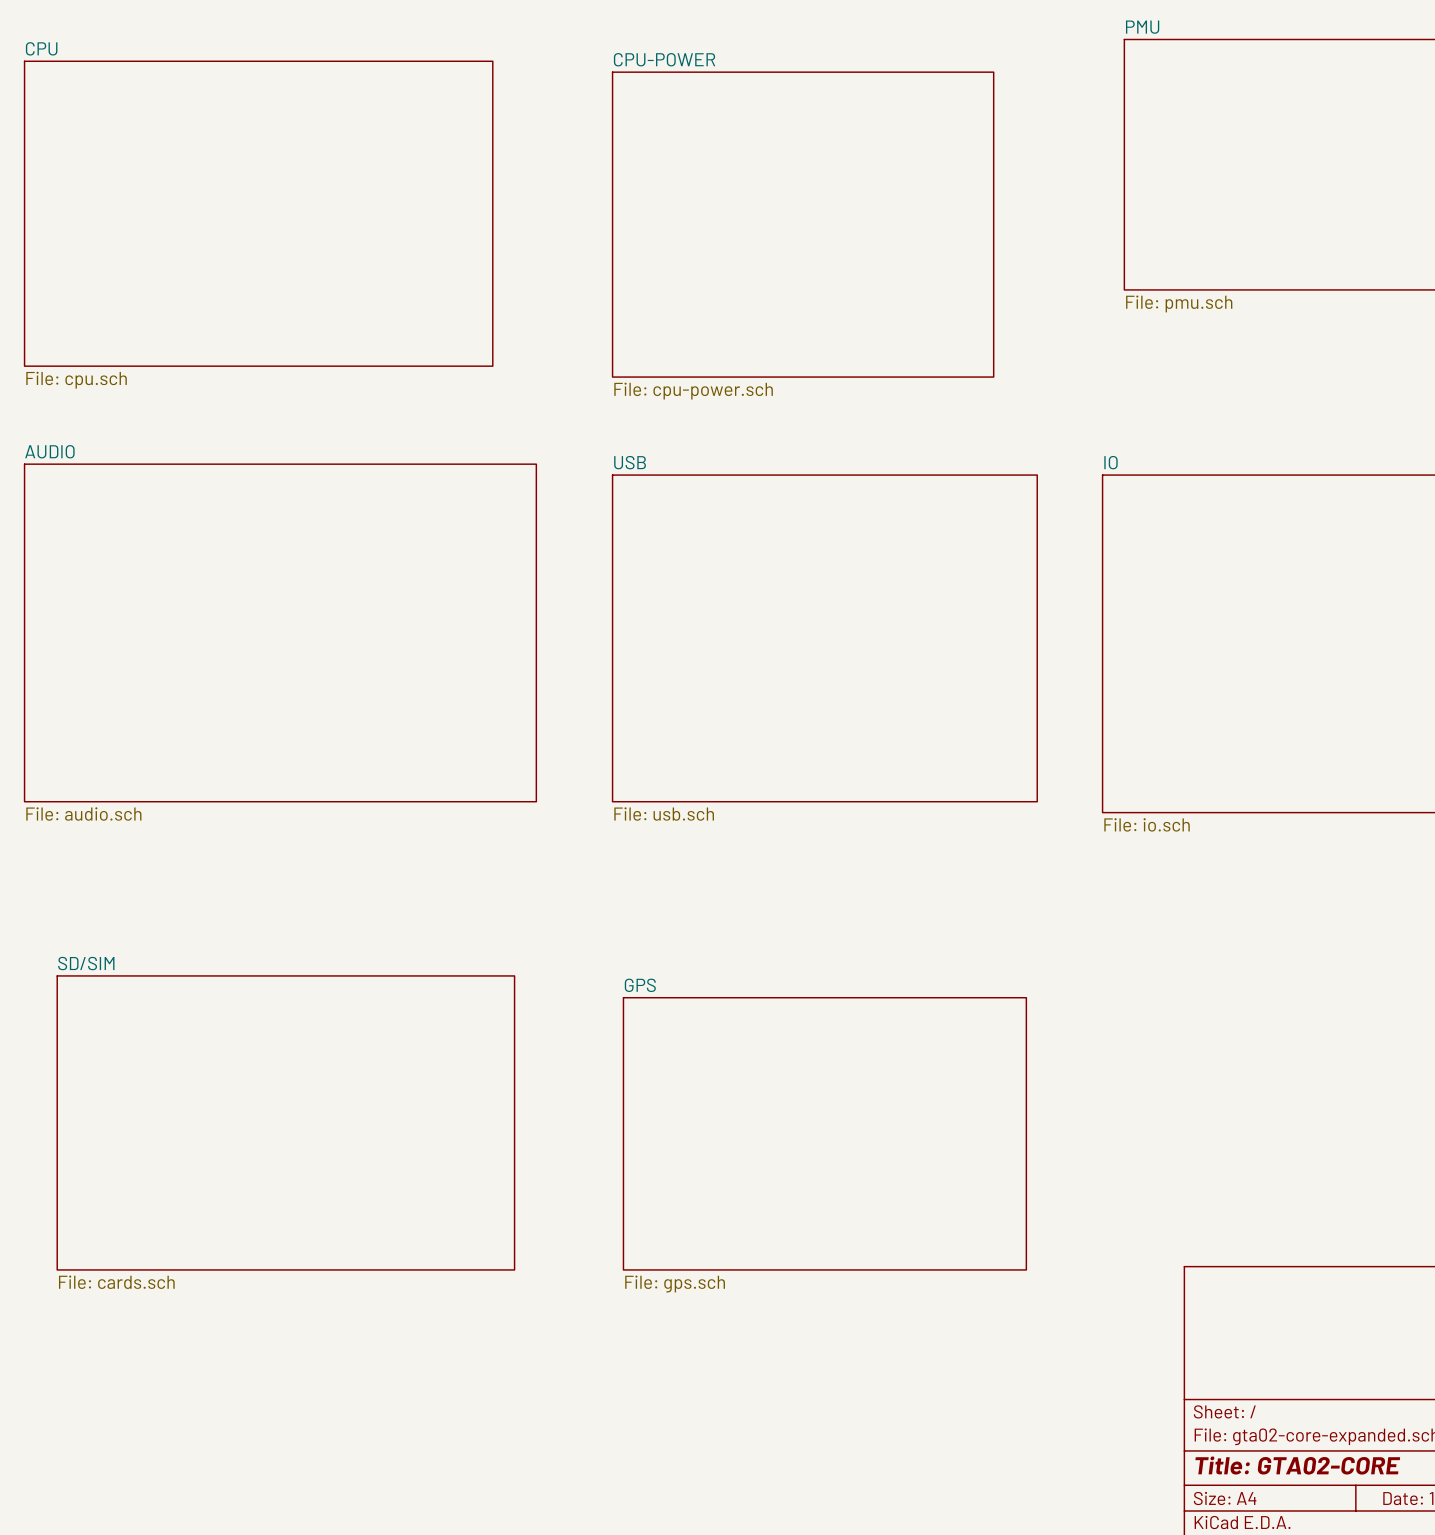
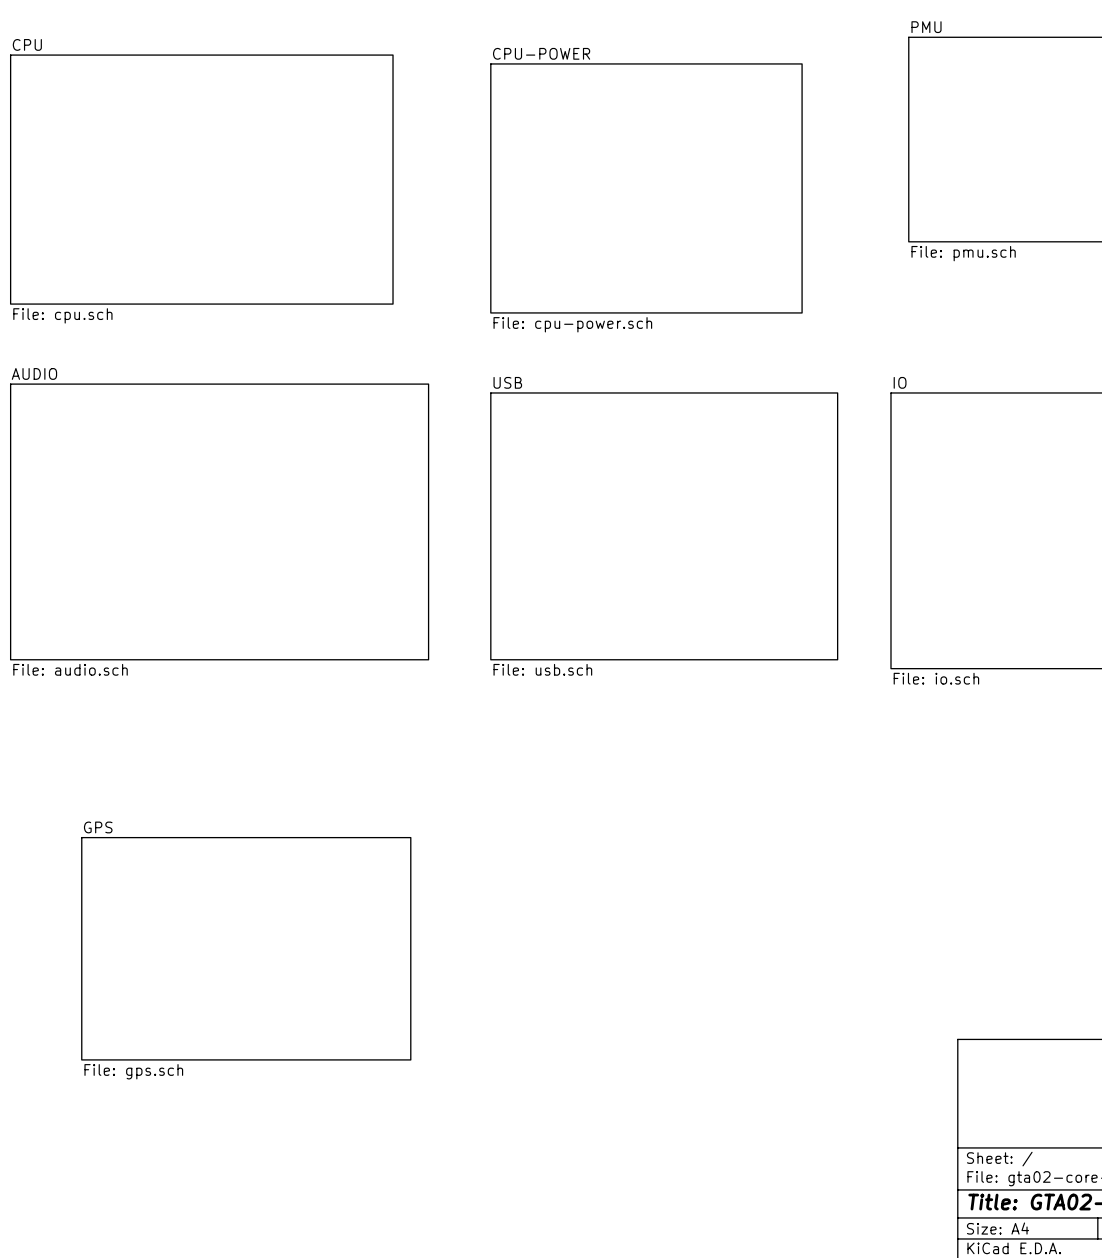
sheet SD/SIM: File: cards.sch (285, 1122) -> none
sheet GPS: File: gps.sch (824, 1133) -> none
sheet GPS: none -> File: gps.sch (246, 948)

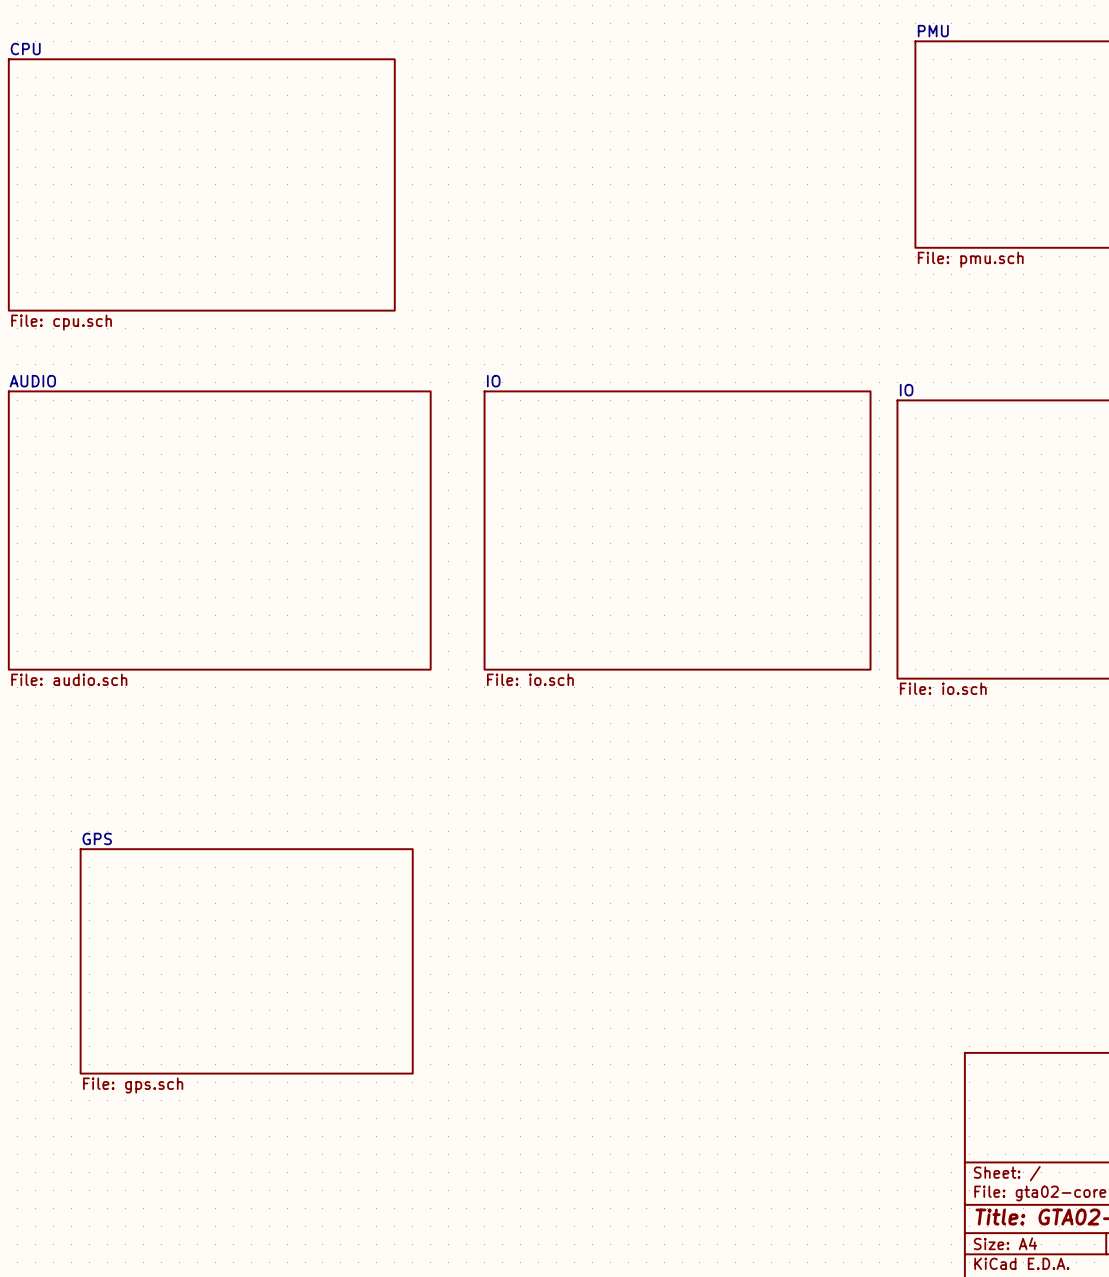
sheet CPU-POWER: File: cpu-power.sch (646, 188) -> none
sheet IO: none -> File: io.sch (677, 530)
sheet USB: File: usb.sch (664, 526) -> none

